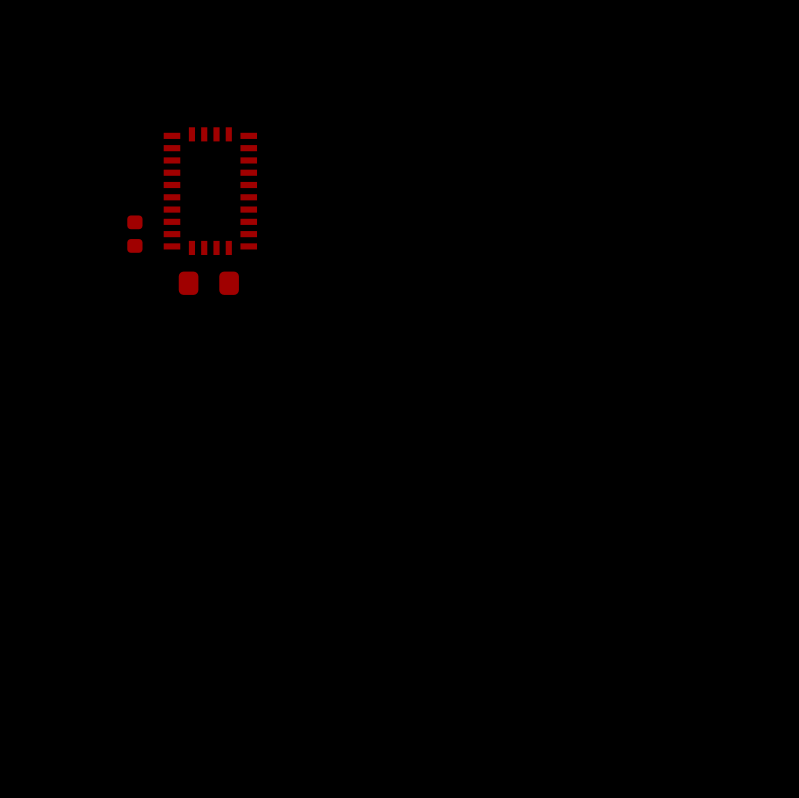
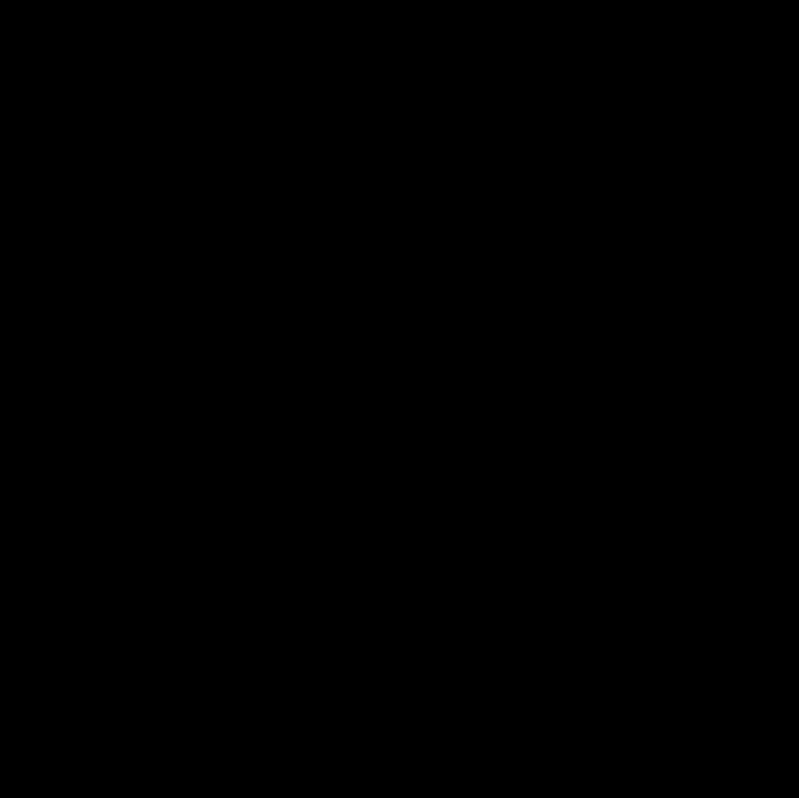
part: (210, 191) -> none
part: (134, 234) -> none
part: (208, 283) -> none

